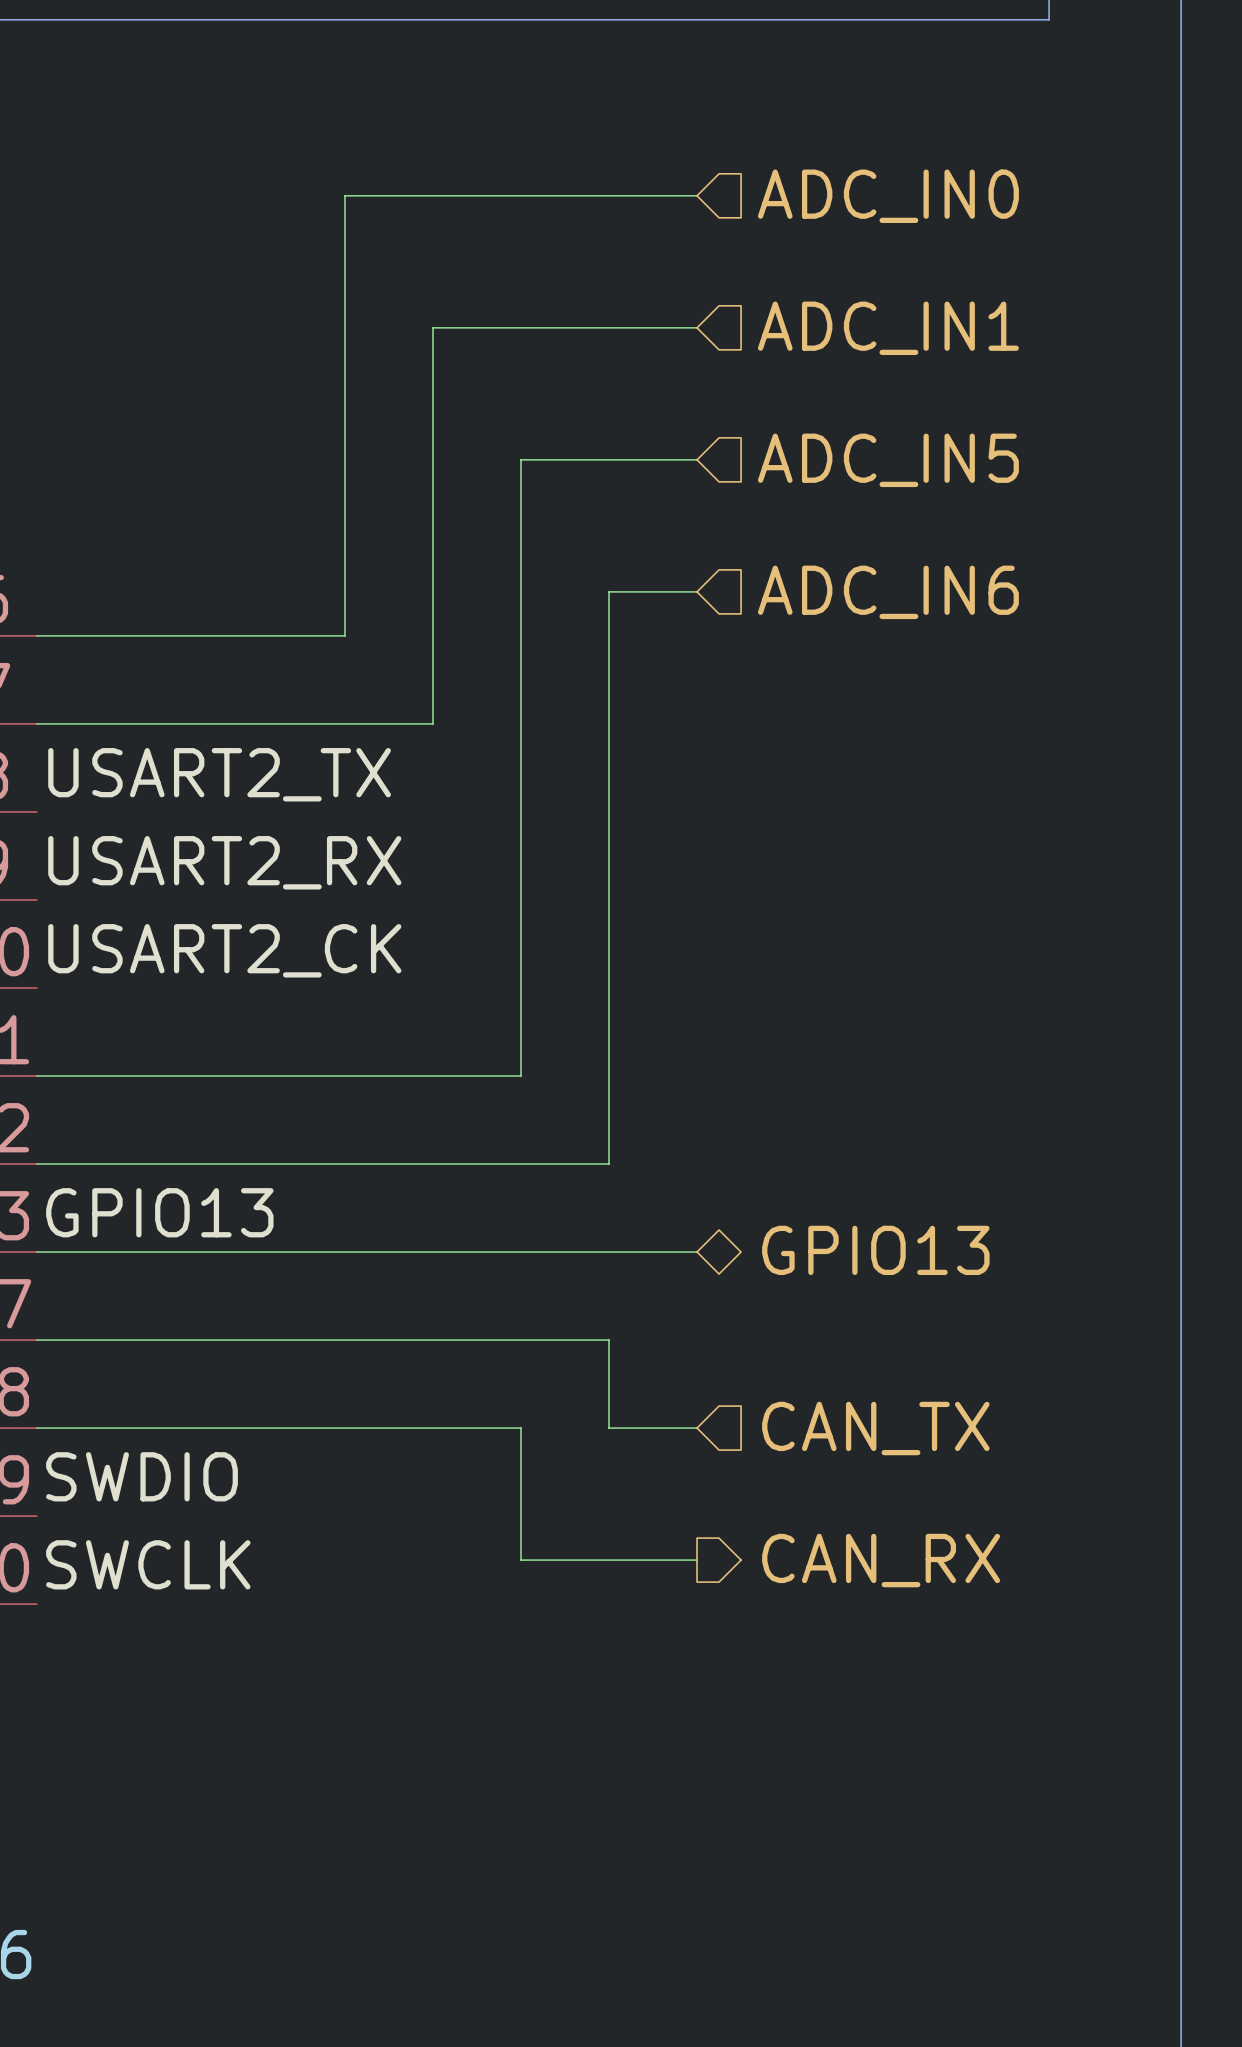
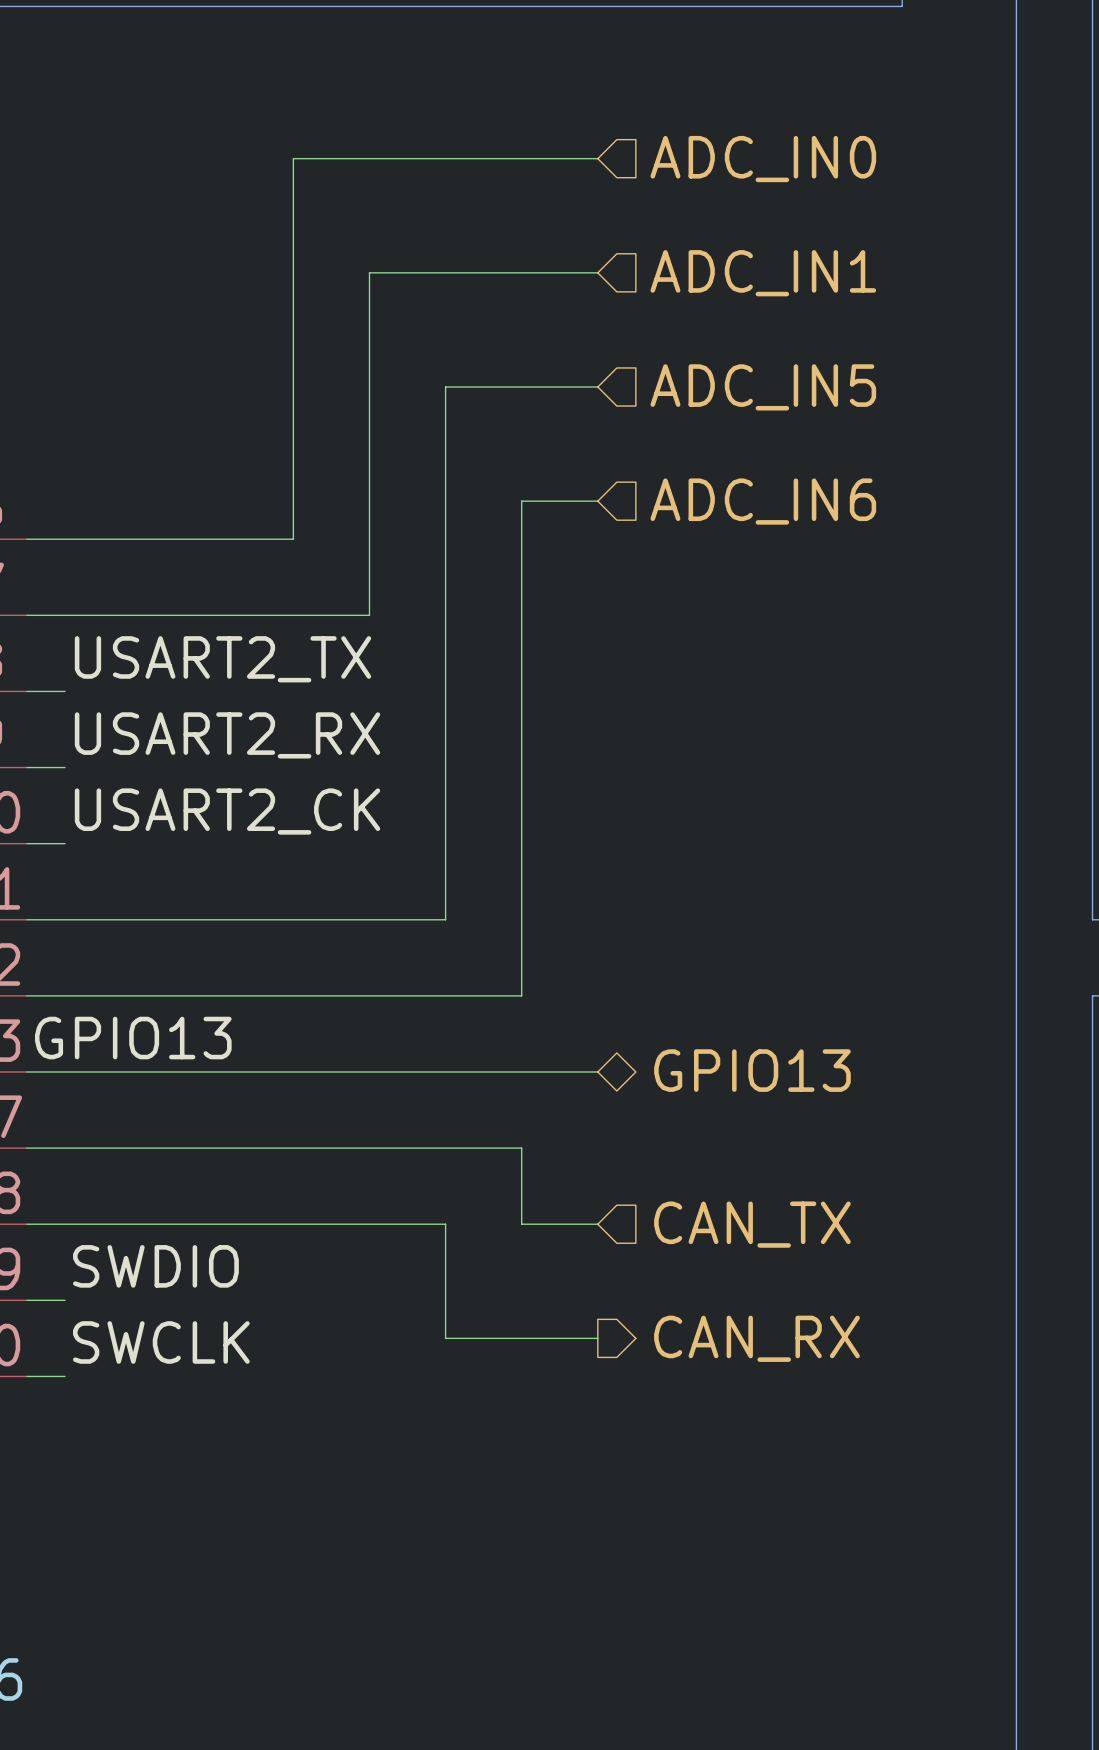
label position: USART2_TX (219, 774) -> USART2_TX (222, 659)
wire: none -> (26, 691) (65, 691)
label position: USART2_RX (224, 862) -> USART2_RX (227, 735)
wire: none -> (26, 767) (65, 767)
label position: USART2_CK (224, 950) -> USART2_CK (227, 811)
wire: none -> (26, 843) (65, 843)
label position: SWDIO (142, 1476) -> SWDIO (155, 1266)
wire: none -> (26, 1300) (65, 1300)
label position: SWCLK (148, 1564) -> SWCLK (161, 1342)
wire: none -> (26, 1376) (65, 1376)

